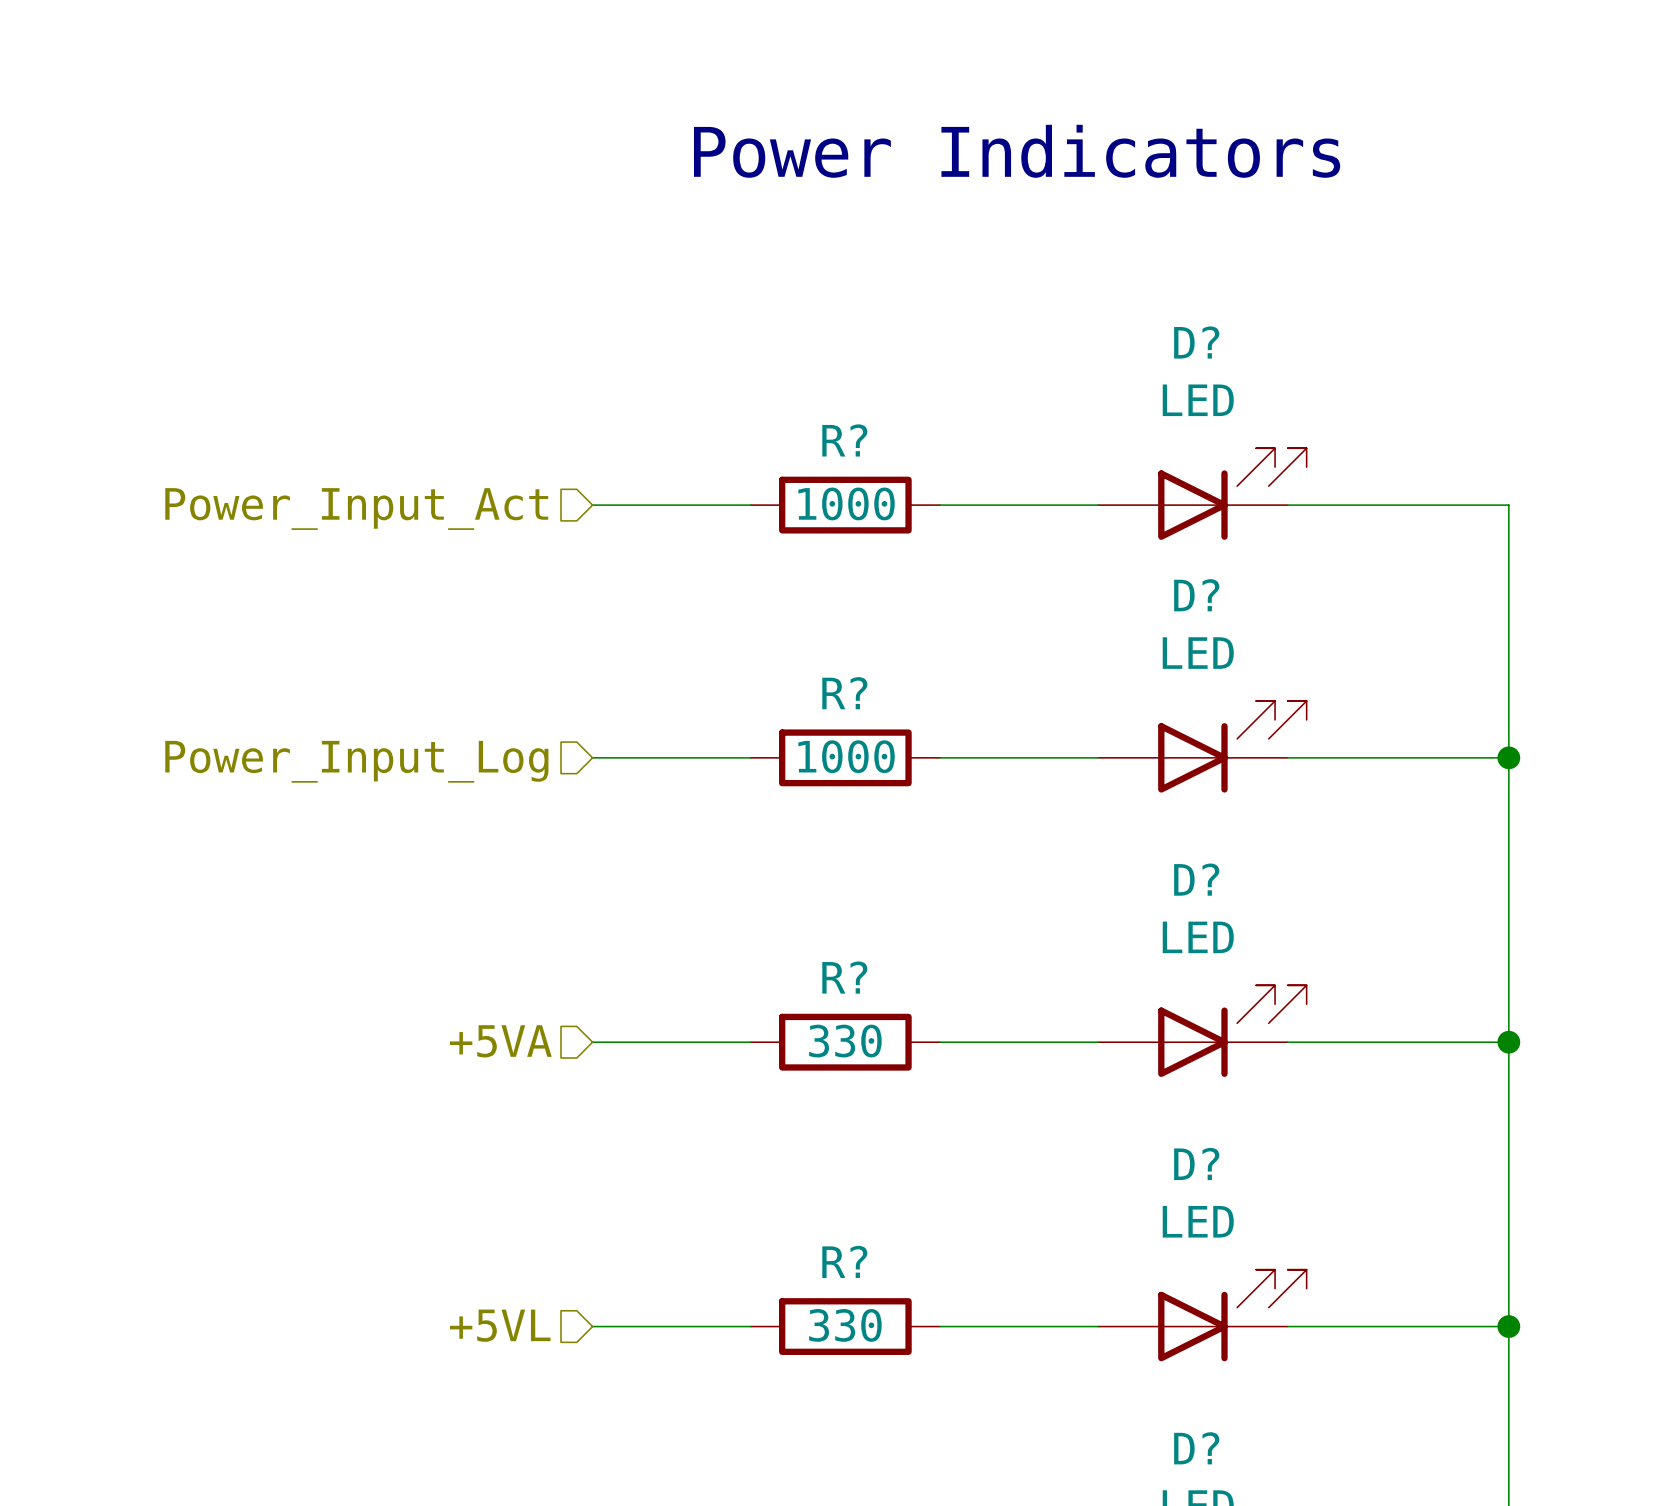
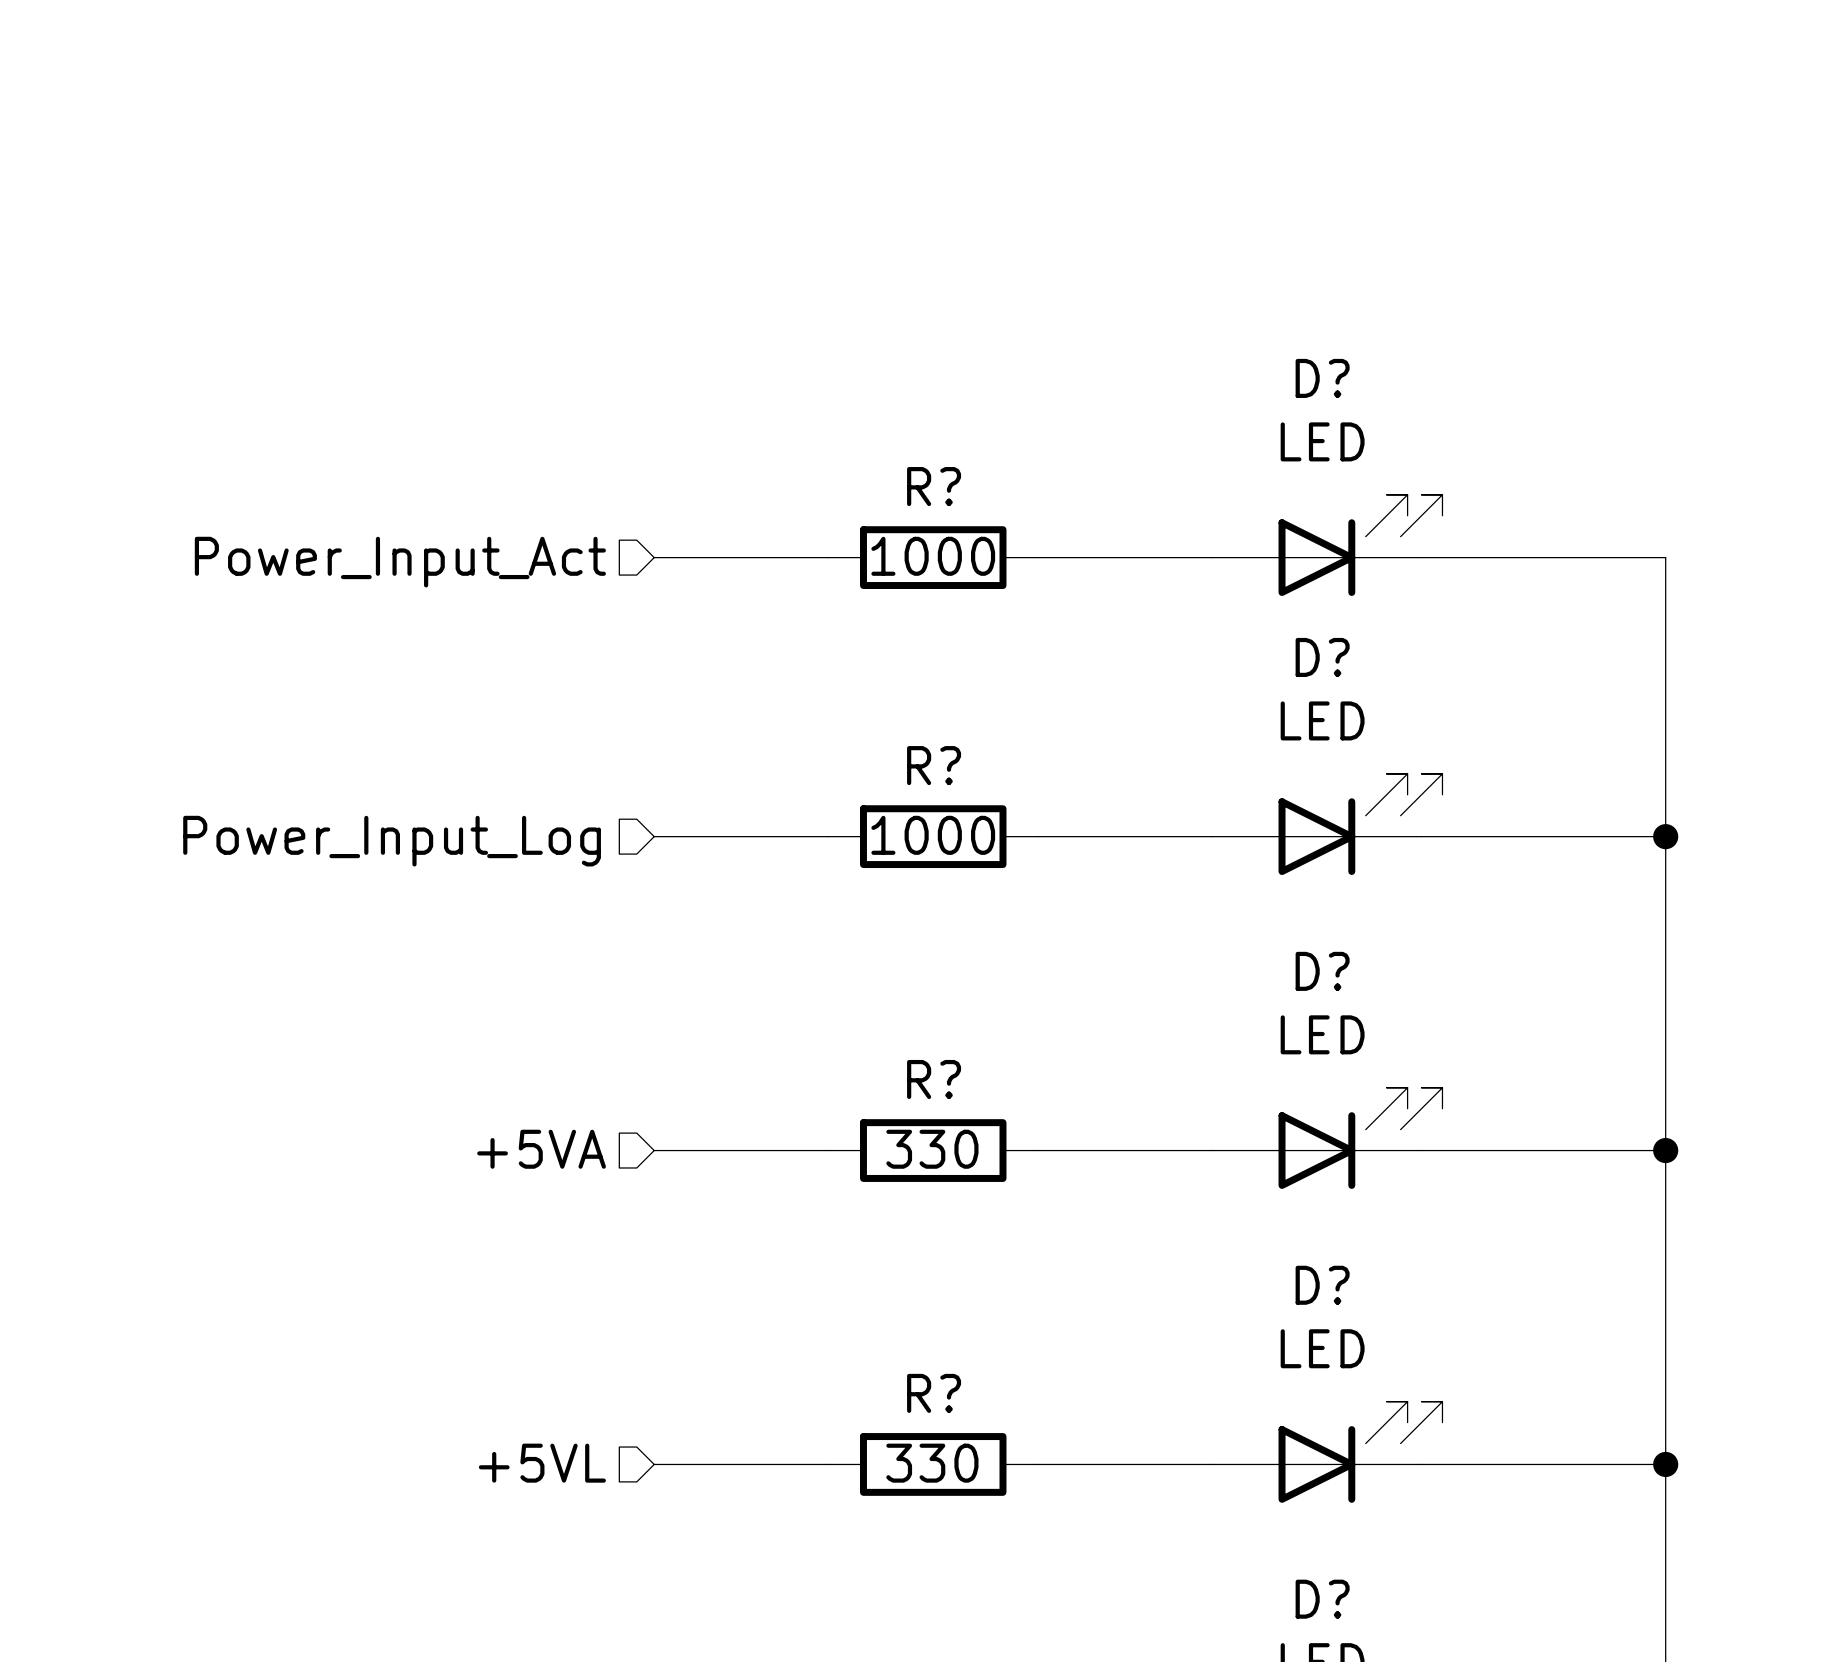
text: Power Indicators (1017, 151) -> none

